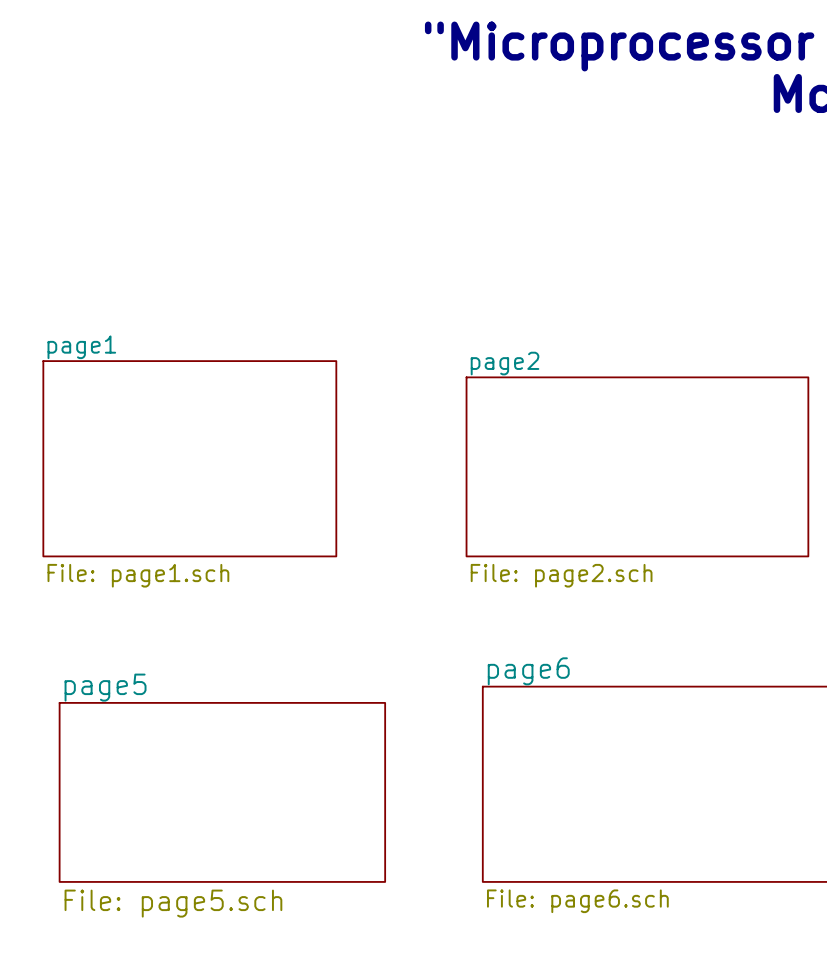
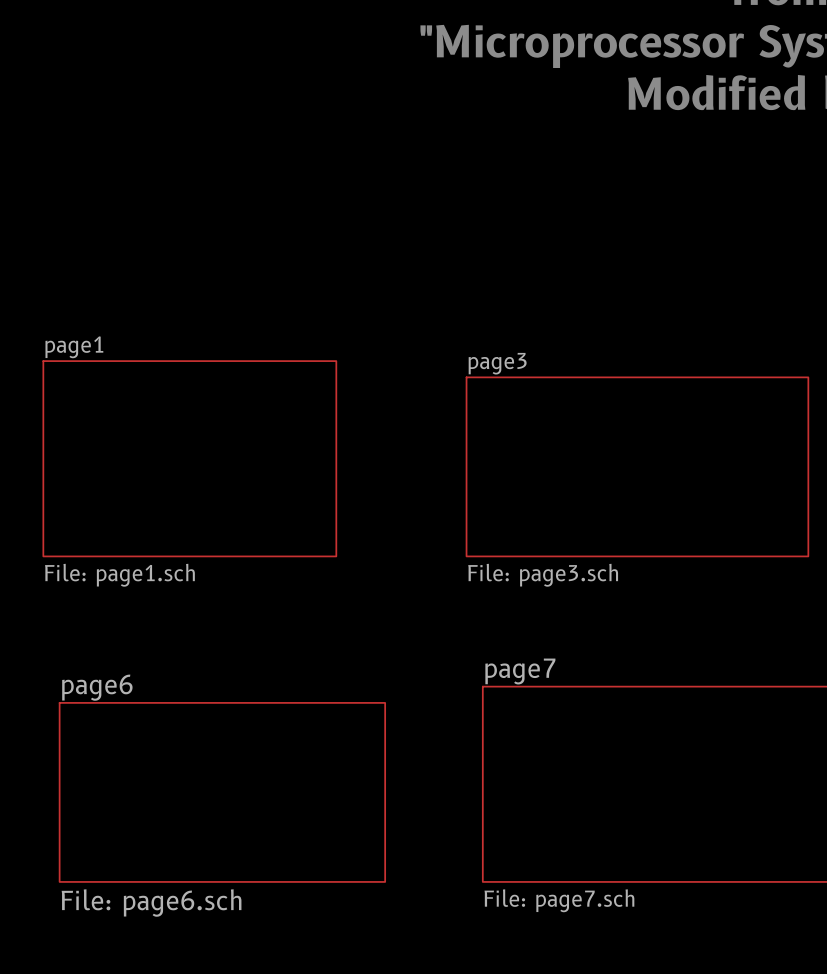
sheet page2 name: page2 (505, 363) -> page3 (497, 363)
sheet page2 value: File: page2.sch (561, 575) -> File: page3.sch (543, 575)
sheet page6 name: page6 (528, 671) -> page7 (520, 671)
sheet page5 name: page5 (105, 687) -> page6 (97, 687)
sheet page6 value: File: page6.sch (577, 901) -> File: page7.sch (559, 900)
sheet page5 value: File: page5.sch (173, 903) -> File: page6.sch (151, 903)

